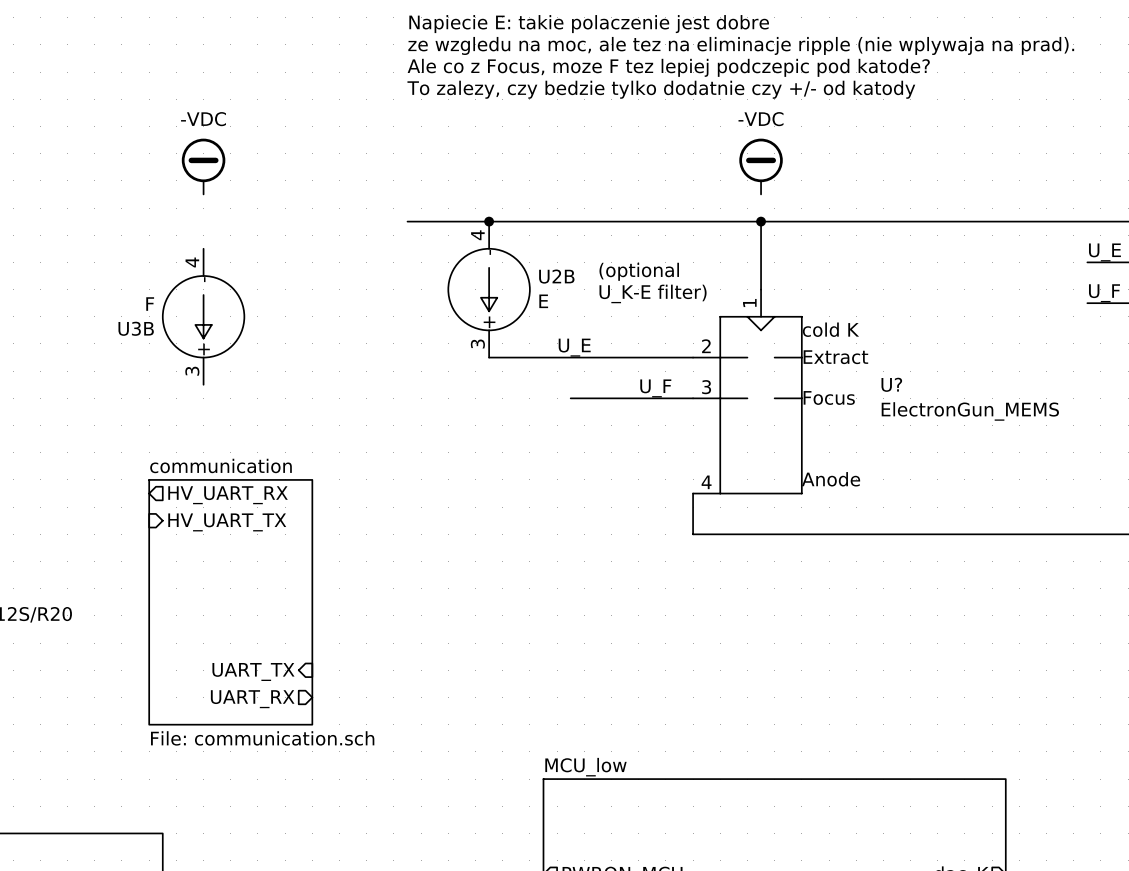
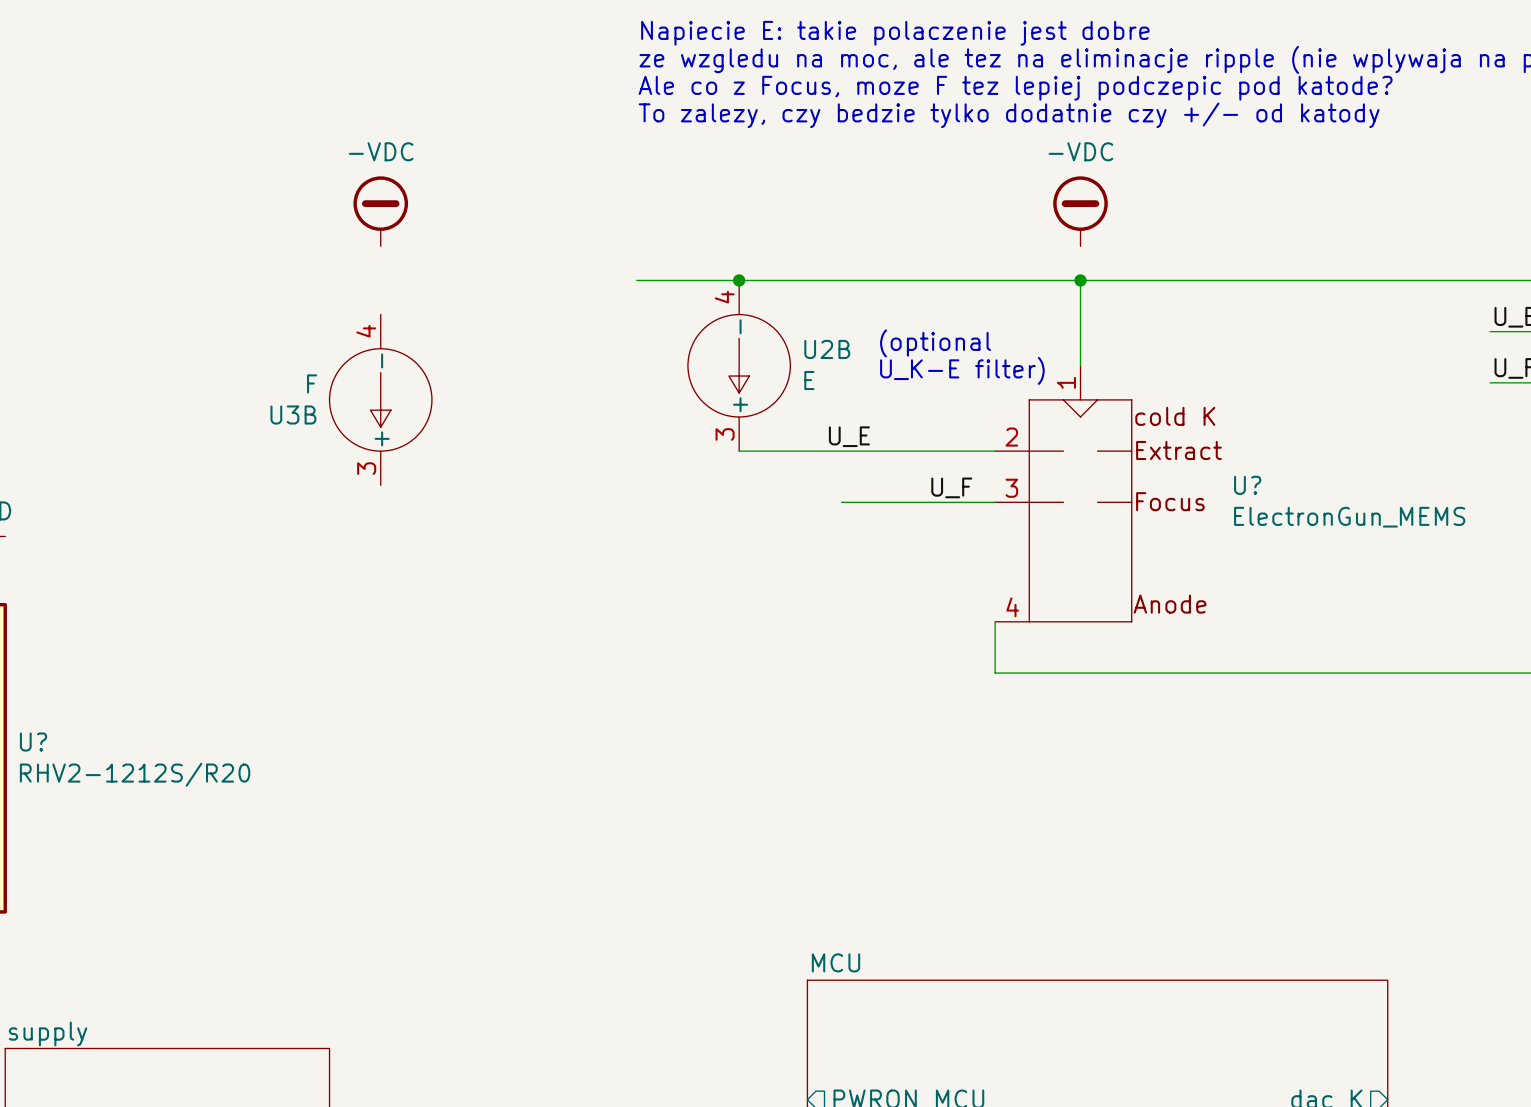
sheet pin: HV_UART_RX (228, 495) -> none
sheet pin: HV_UART_TX (227, 522) -> none
sheet communication: File: communication.sch (230, 602) -> none
sheet pin: UART_TX (253, 671) -> none
sheet pin: UART_RX (252, 699) -> none
sheet MCU_low name: MCU_low (585, 767) -> MCU (836, 962)

